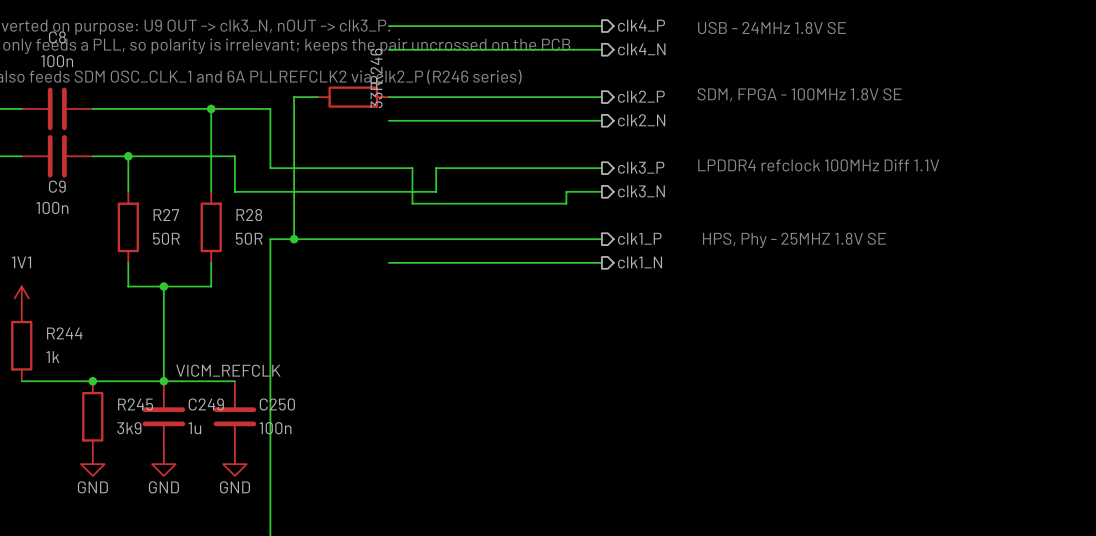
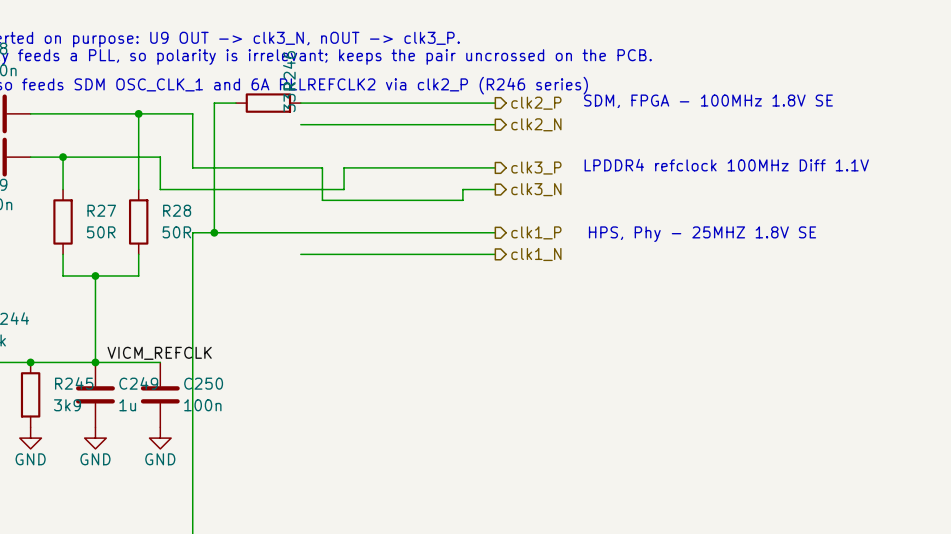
hierarchical label: clk4_P (641, 25) -> none
wire: (388, 26) (601, 26) -> none
text: USB - 24MHz 1.8V SE (771, 28) -> none
wire: (388, 49) (601, 49) -> none
hierarchical label: clk4_N (641, 49) -> none

